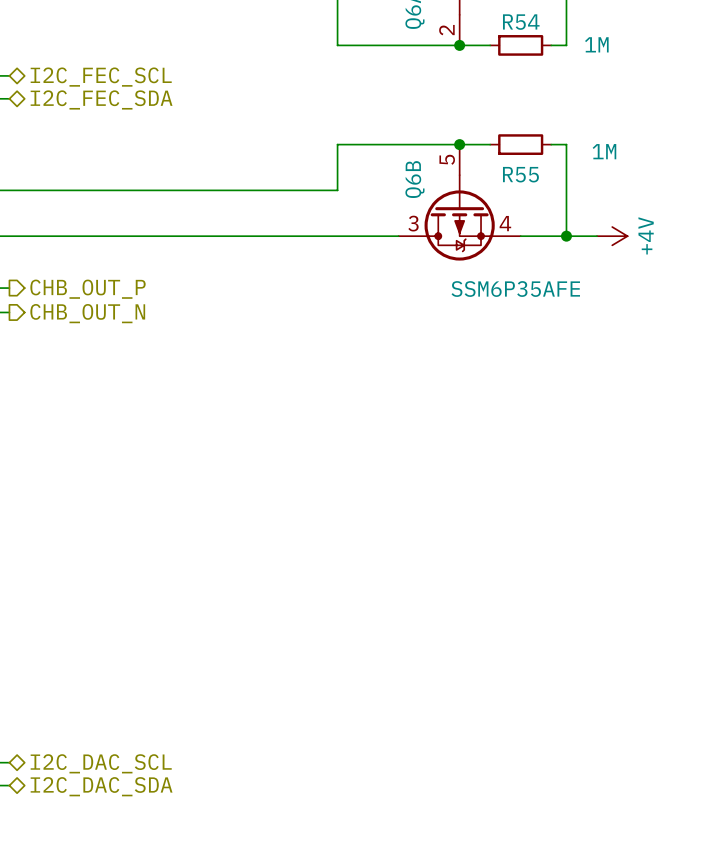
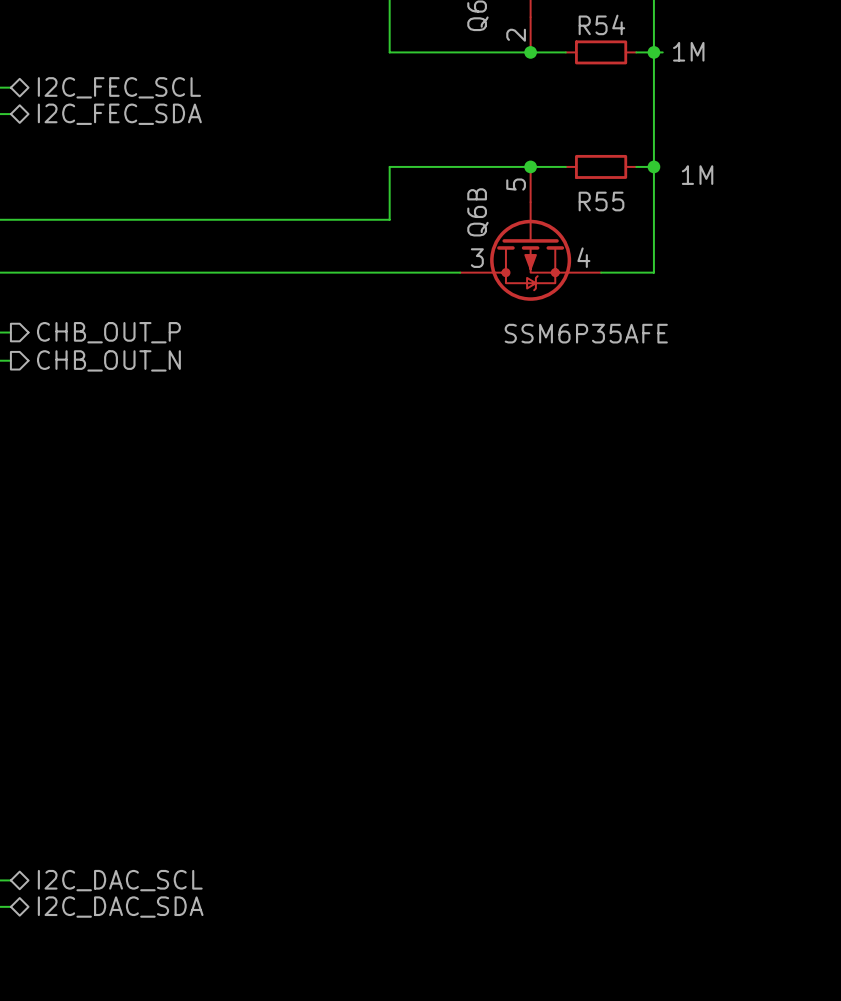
junction: none -> (653, 52)
wire: none -> (662, 52) (653, 52) (653, 166)
junction: none -> (653, 166)
wire: (566, 236) (597, 236) -> none
junction: (566, 236) -> none
power symbol: +4V (612, 236) -> none

